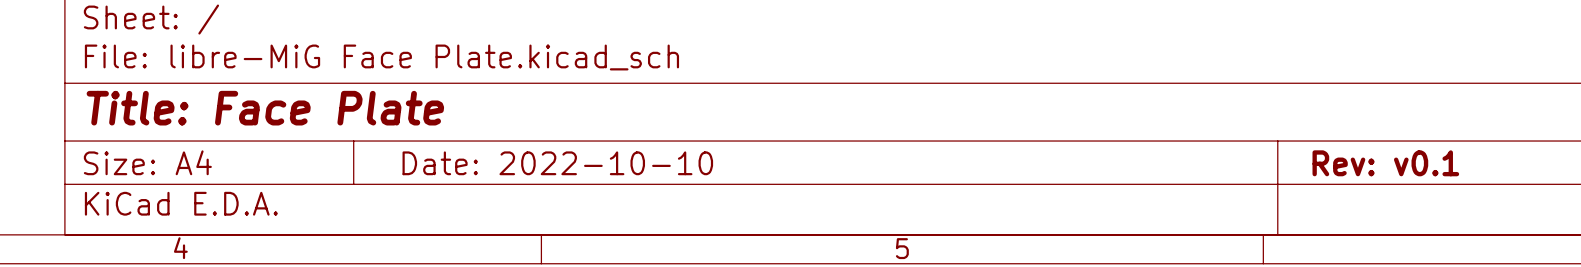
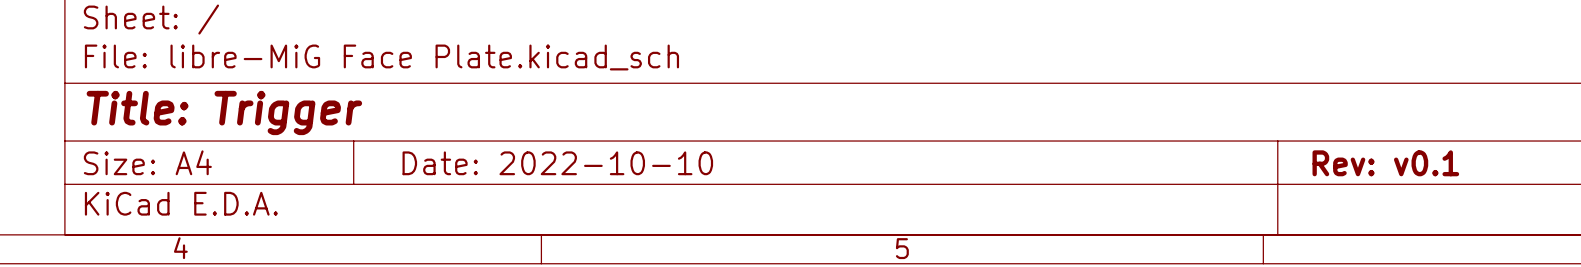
title block: Title: Face Plate (265, 108) -> Title: Trigger (224, 112)

